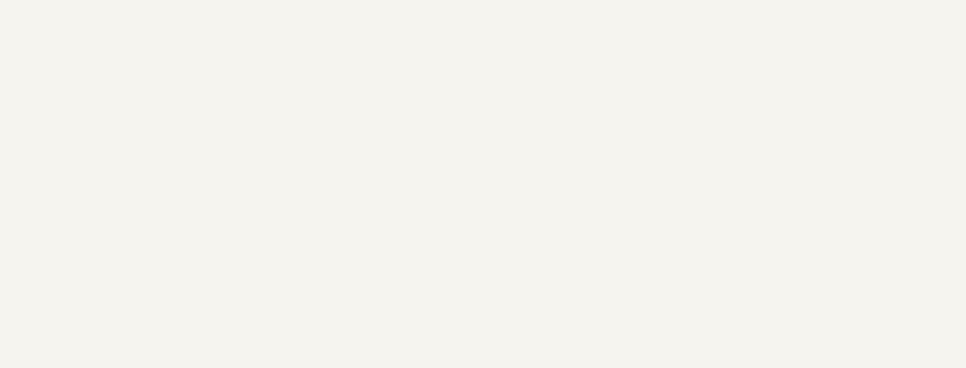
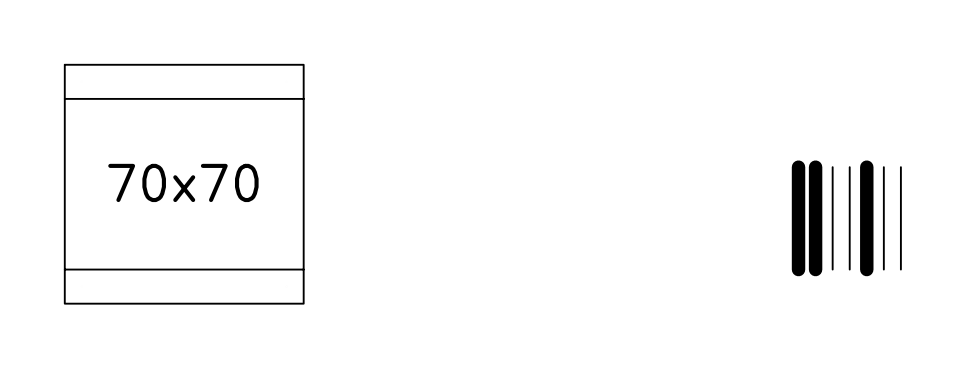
part: none -> (184, 98)
part: none -> 70x70 (184, 184)
part: none -> (846, 218)
part: none -> (184, 269)

